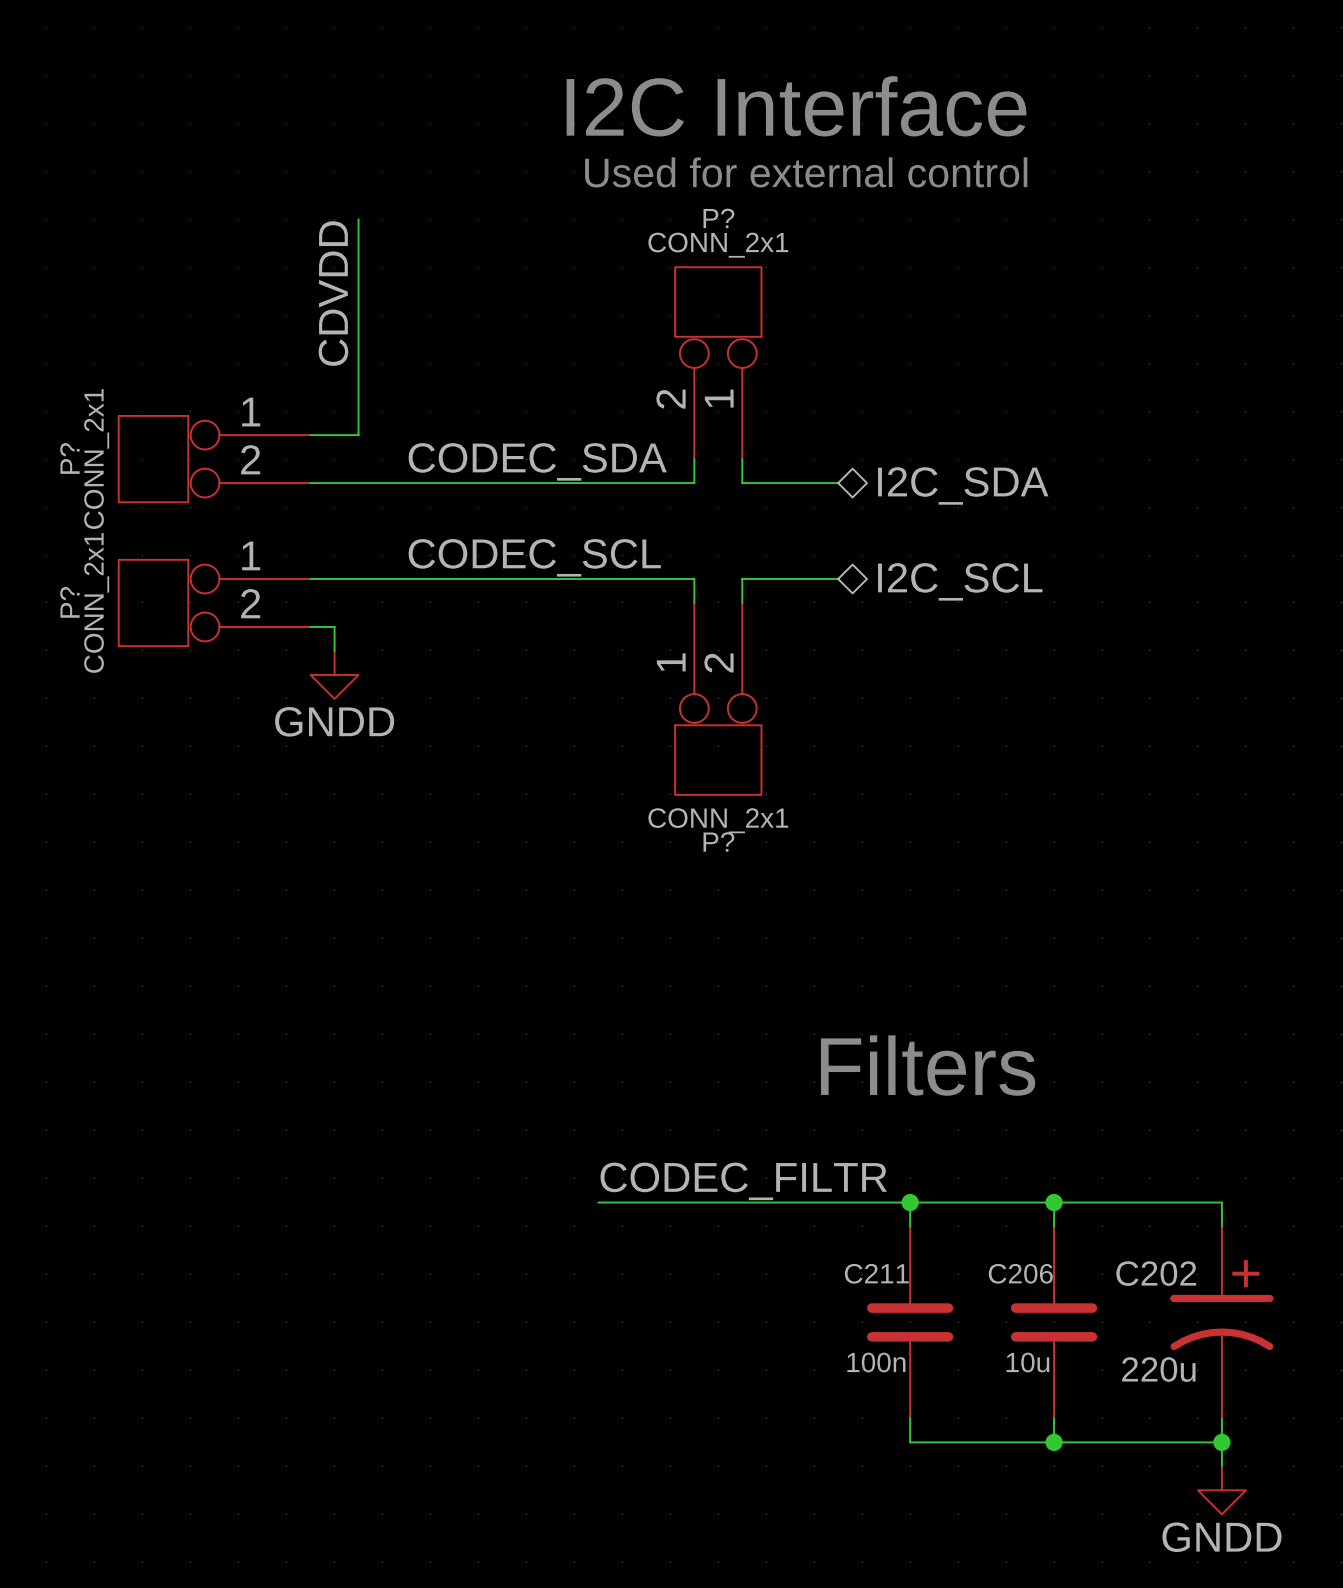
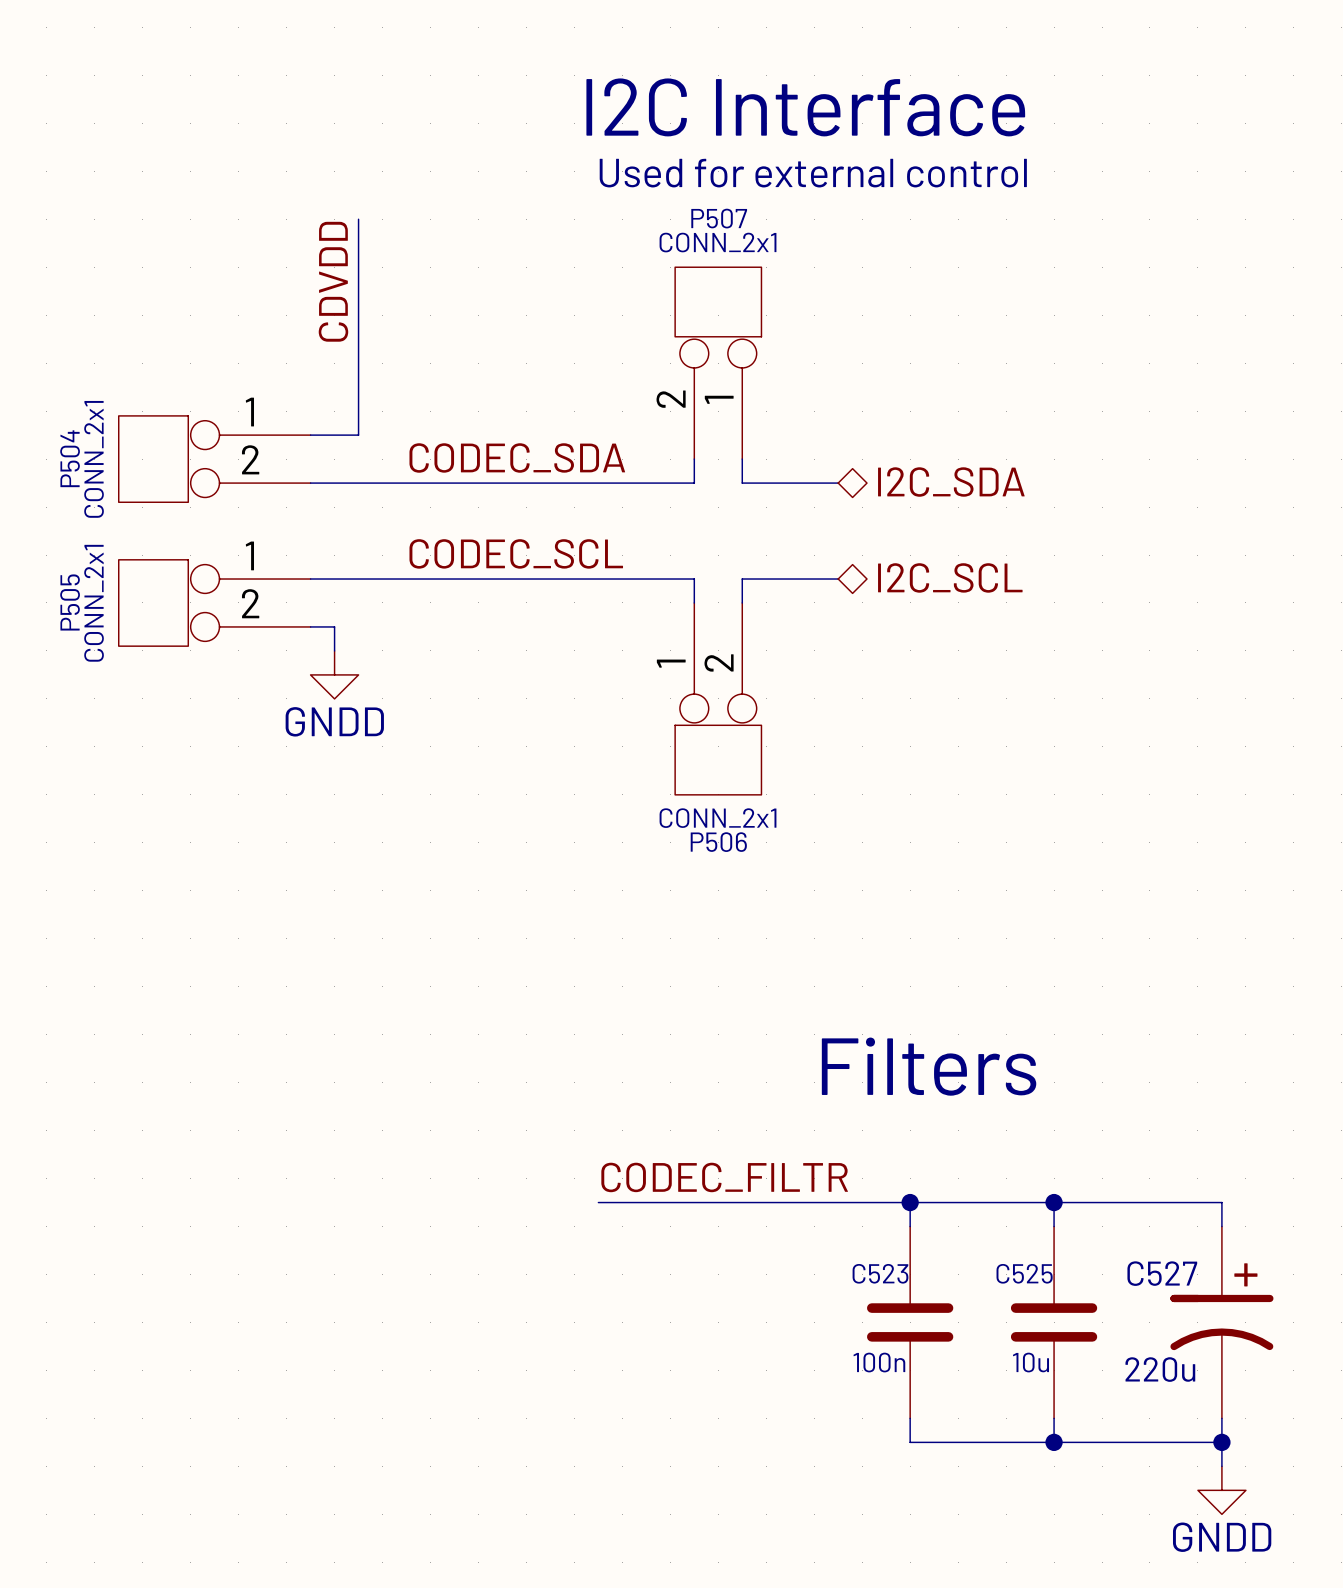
P? name: P? (718, 218) -> P507 (719, 218)
P? name: P? (69, 458) -> P504 (70, 458)
P? name: P? (69, 602) -> P505 (70, 602)
P? name: P? (718, 841) -> P506 (718, 842)
C211 name: C211 (876, 1273) -> C523 (880, 1273)
C206 name: C206 (1020, 1273) -> C525 (1024, 1273)
C202 name: C202 (1156, 1273) -> C527 (1162, 1273)

